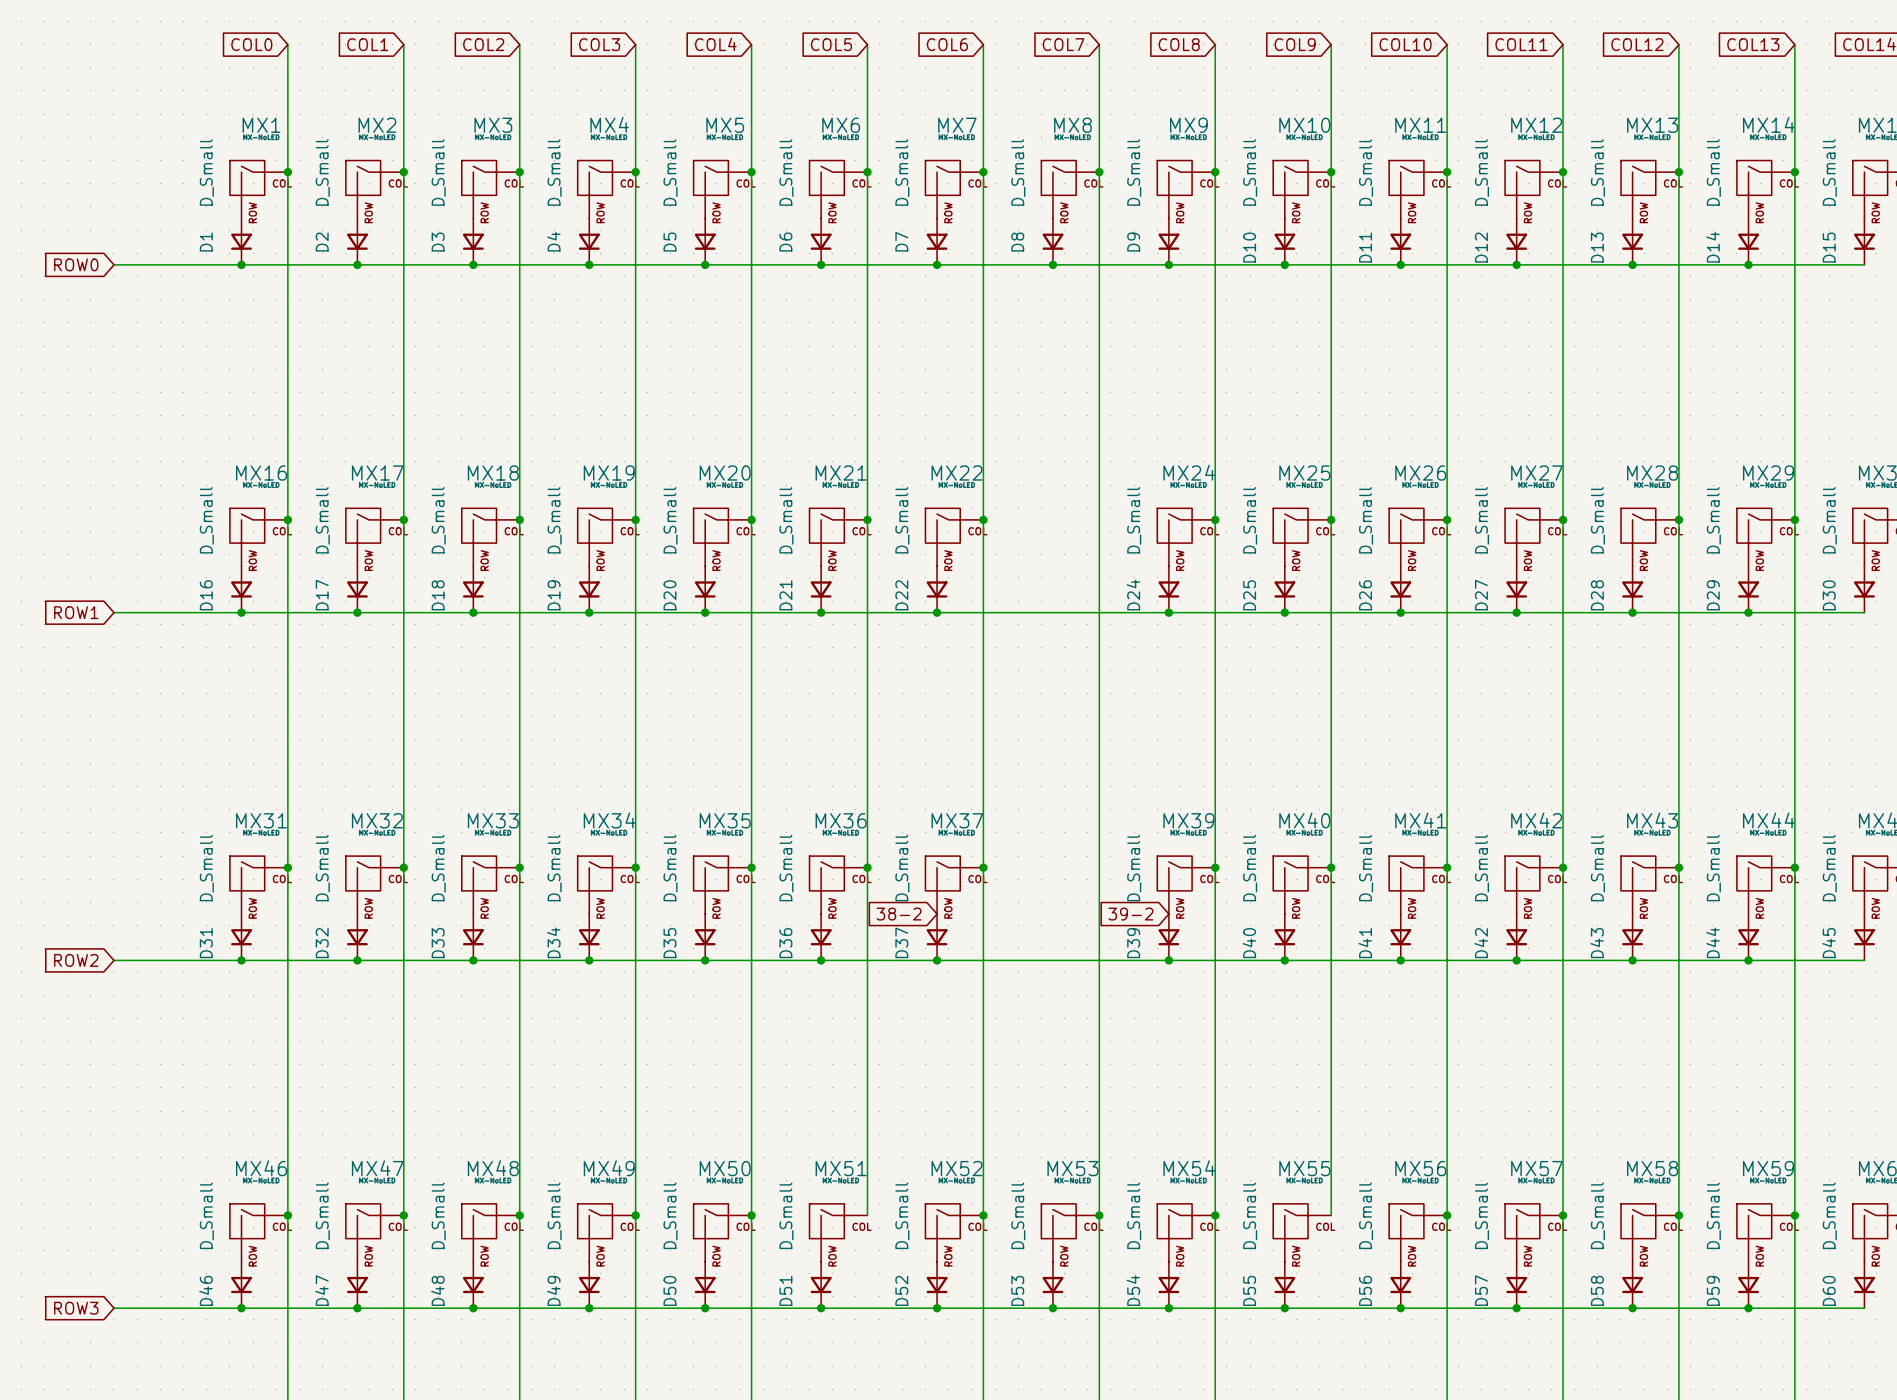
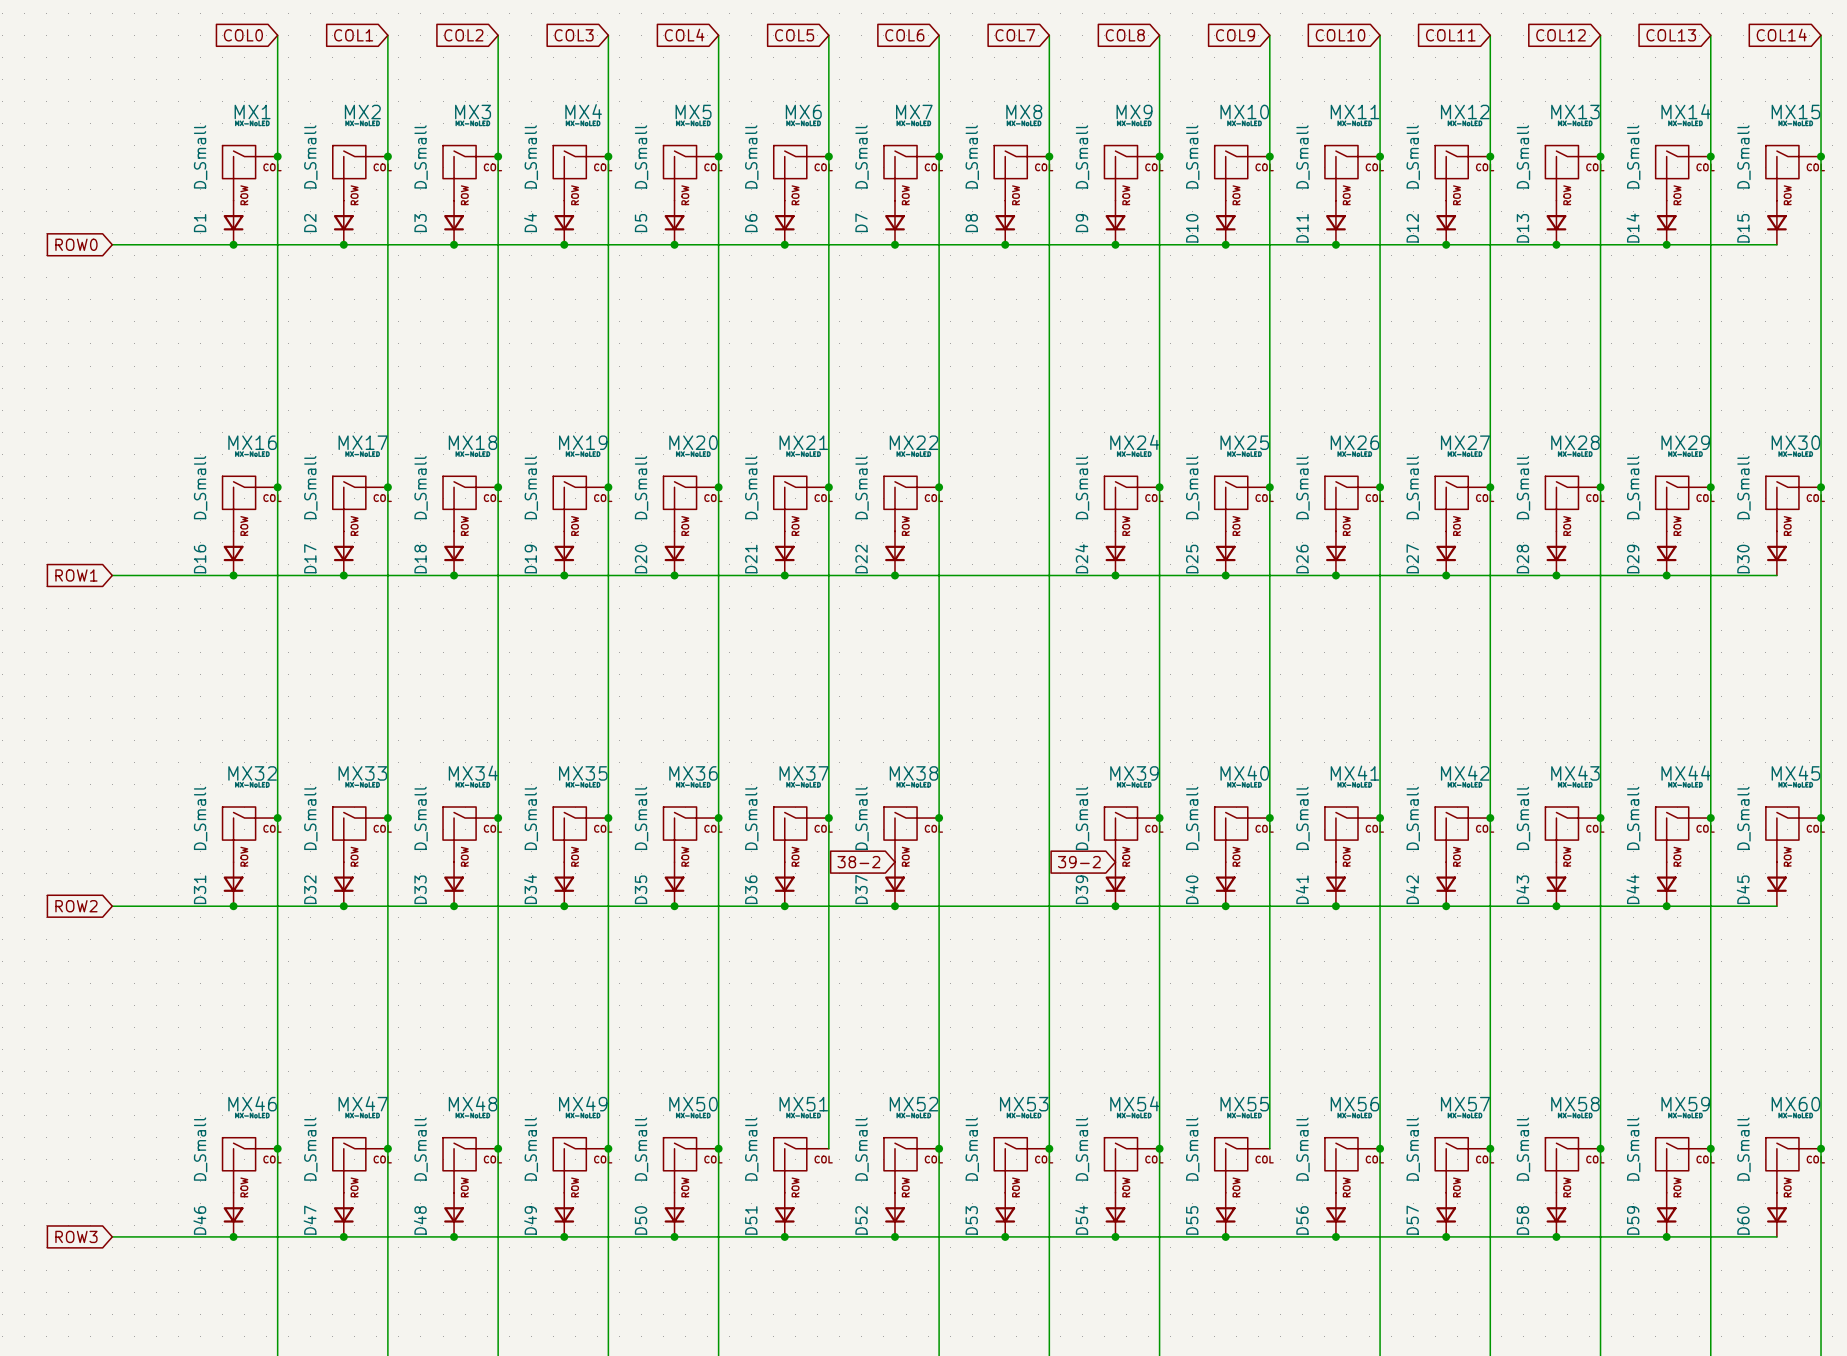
MX31 name: MX31 (261, 820) -> MX32 (252, 773)
MX32 name: MX32 (377, 820) -> MX33 (362, 773)
MX33 name: MX33 (493, 820) -> MX34 (473, 773)
MX34 name: MX34 (609, 820) -> MX35 (583, 773)
MX35 name: MX35 (725, 820) -> MX36 (693, 773)
MX36 name: MX36 (841, 820) -> MX37 (804, 773)
MX37 name: MX37 (957, 820) -> MX38 (914, 773)

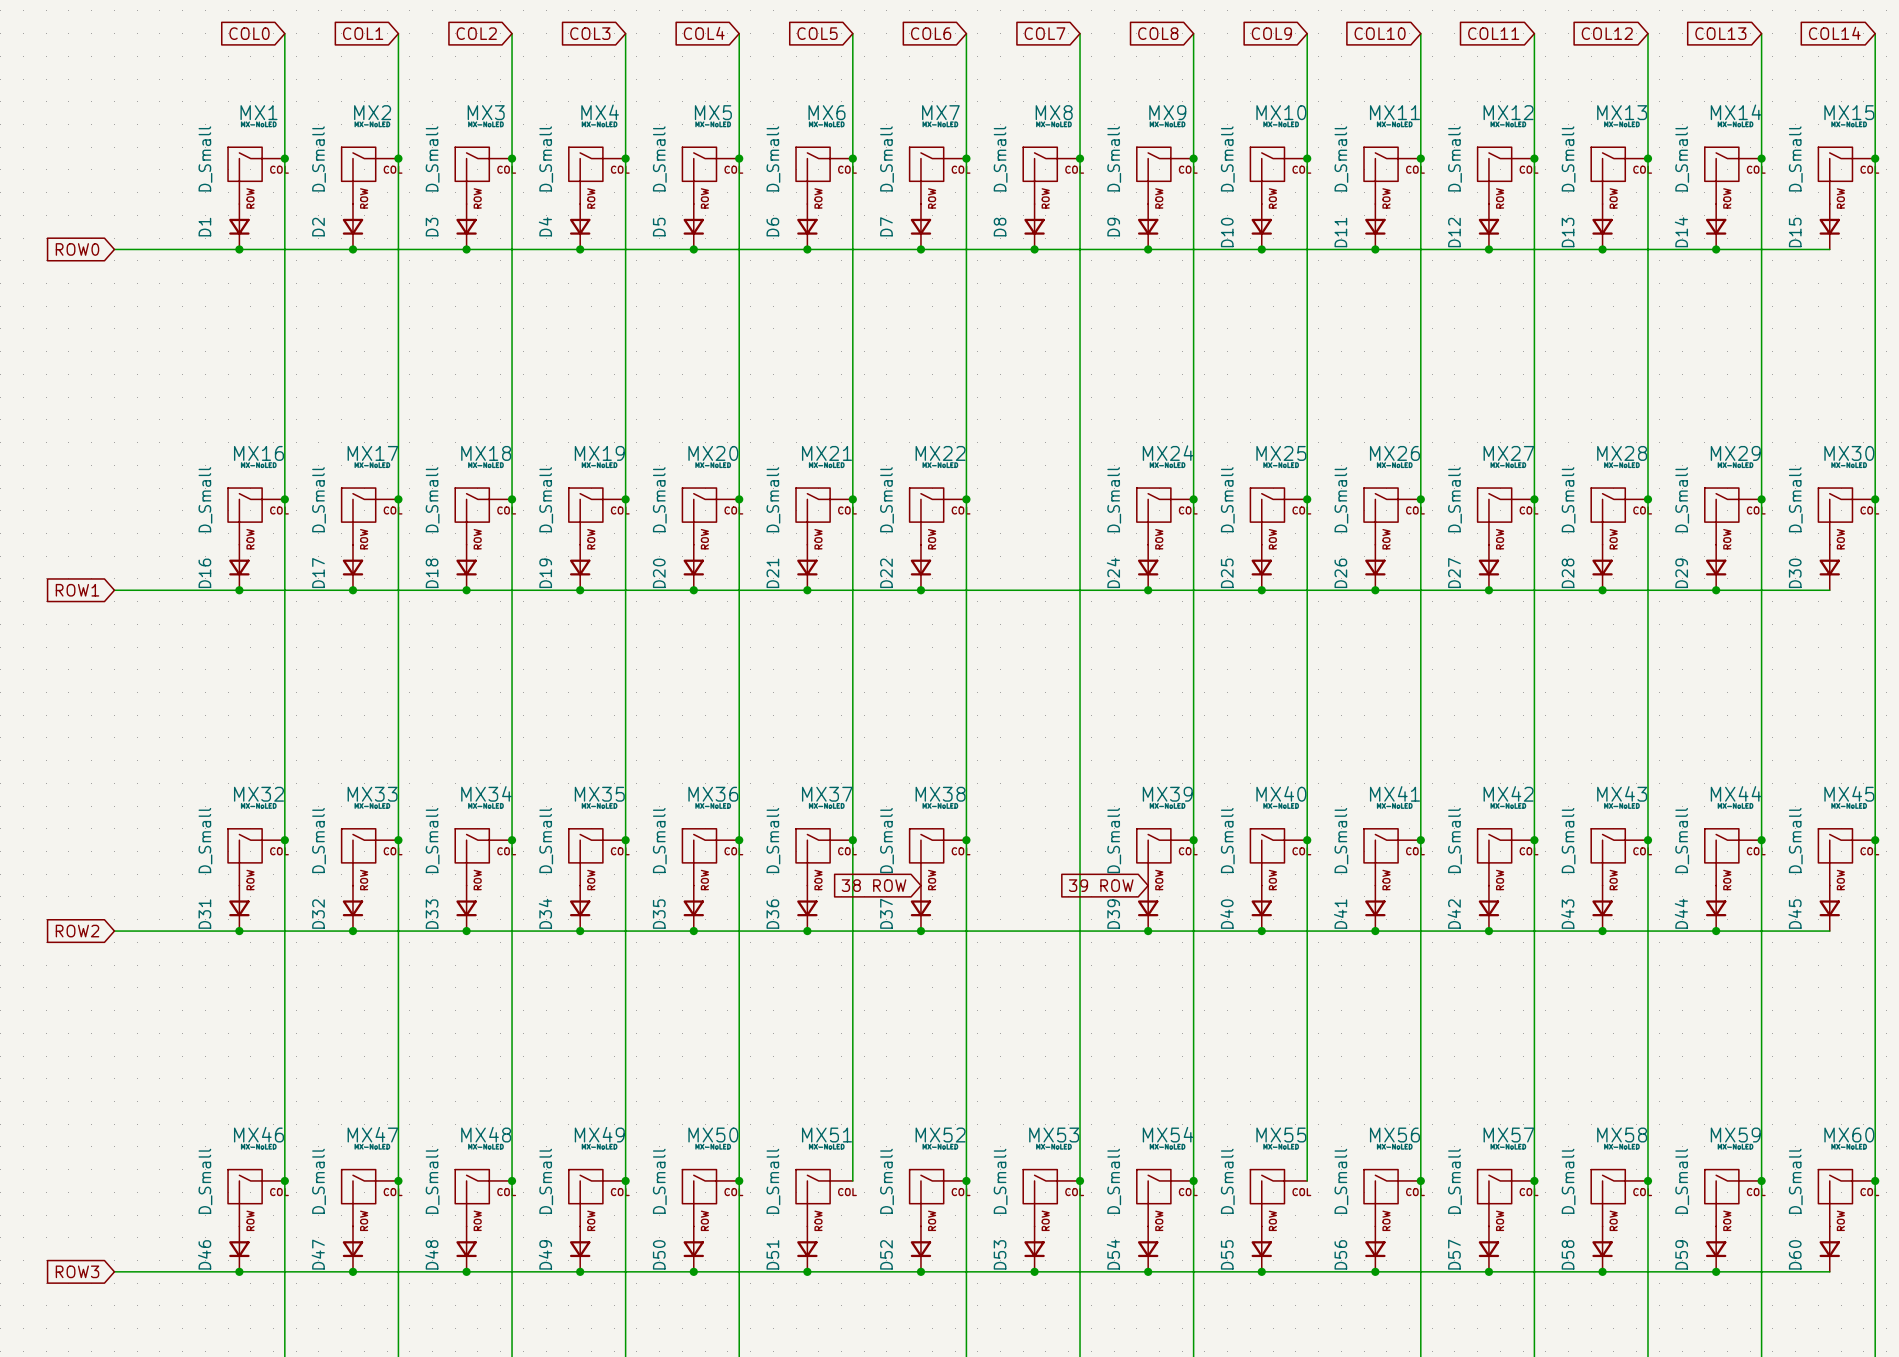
global label: 38-2 (858, 862) -> 38 ROW (874, 885)
global label: 39-2 (1079, 862) -> 39 ROW (1101, 885)

